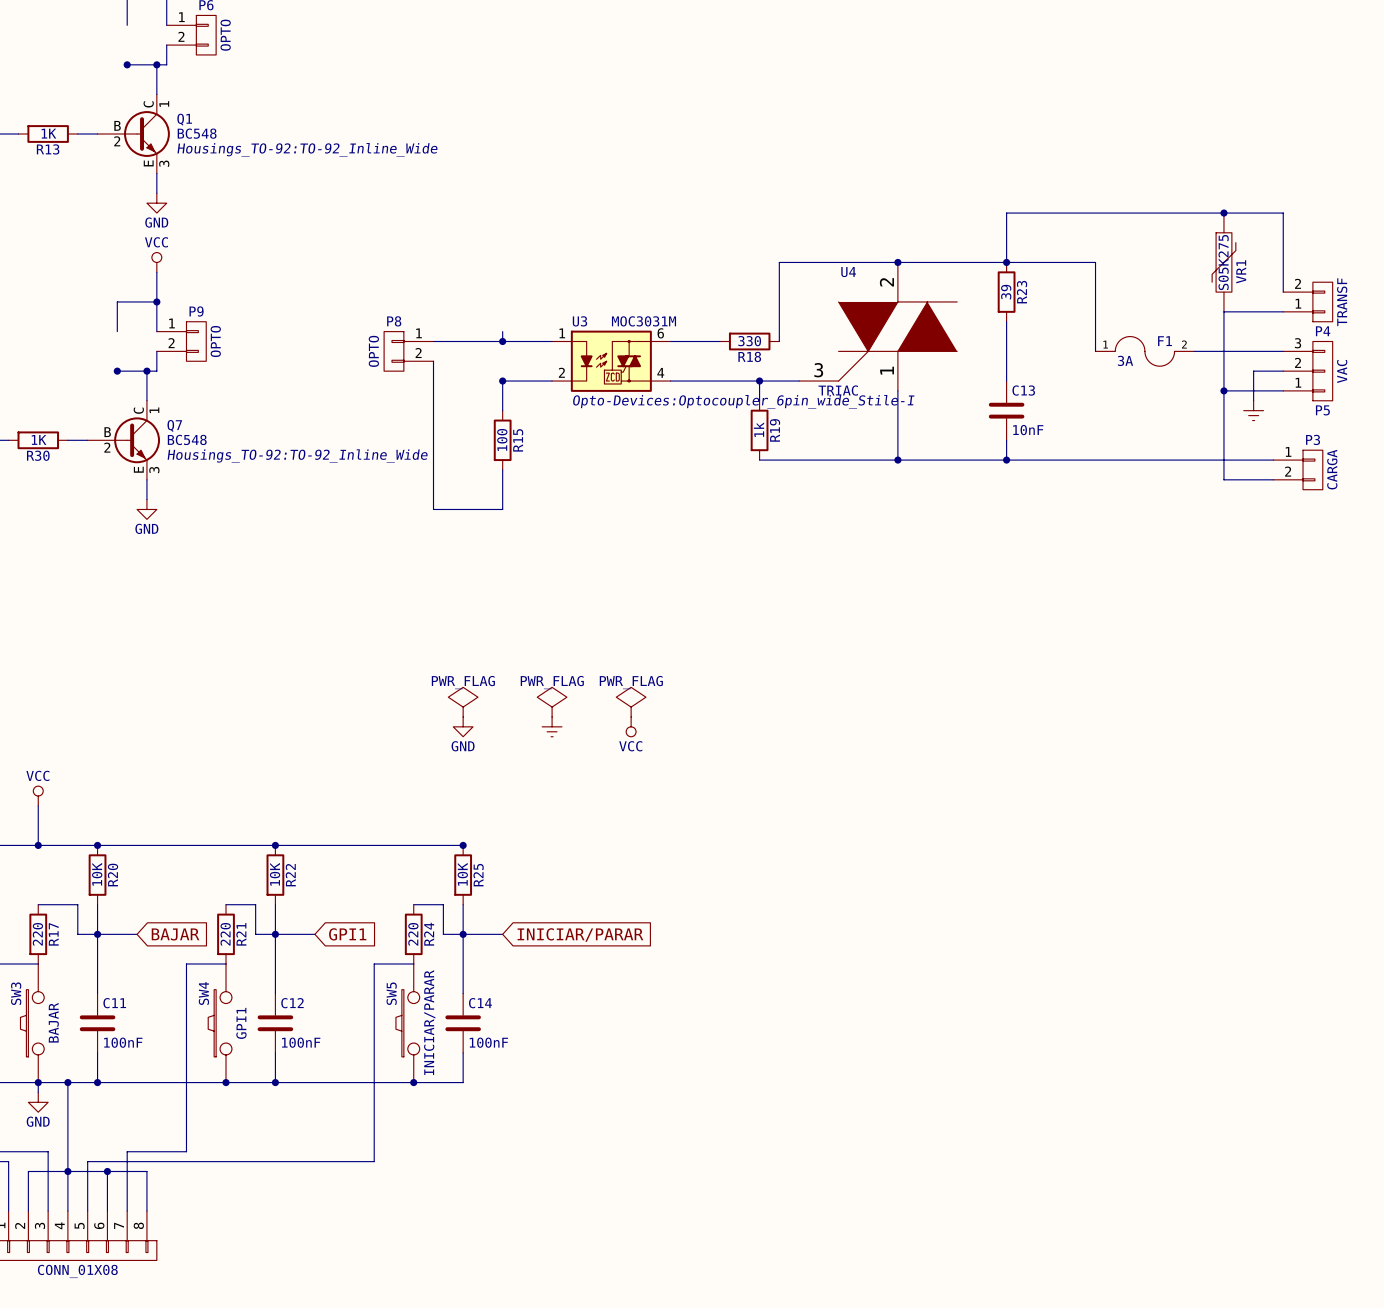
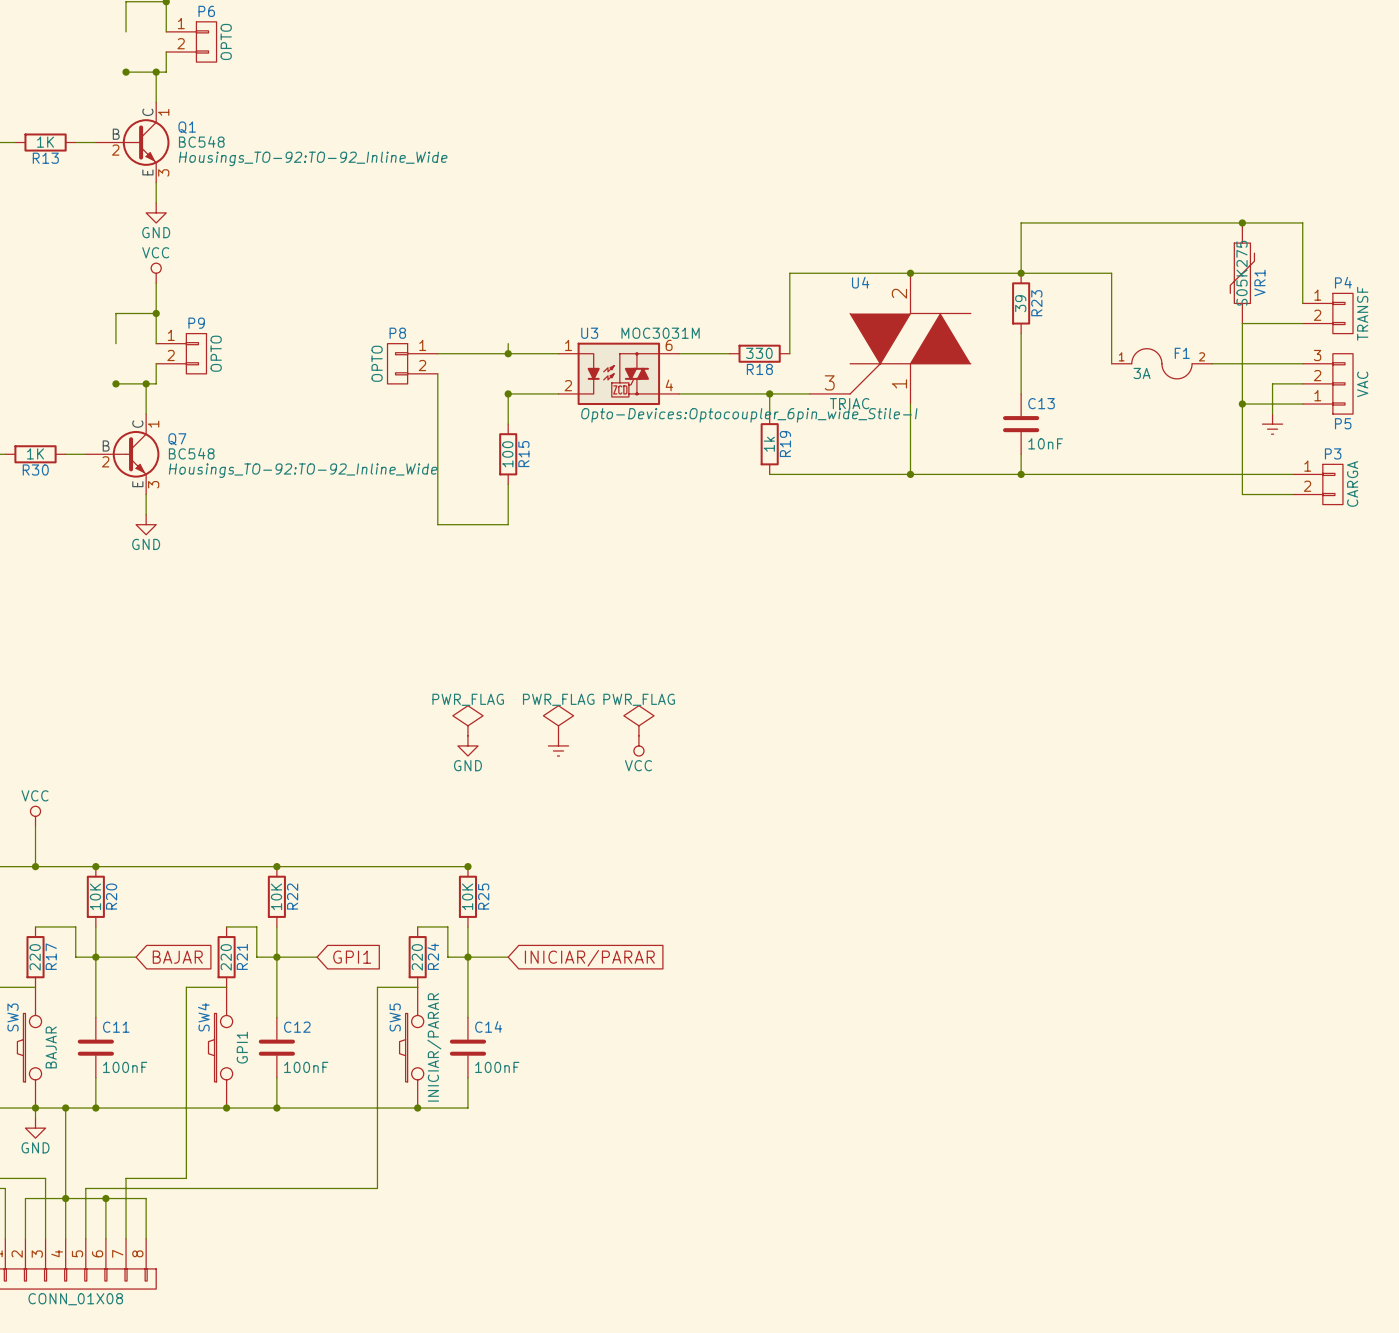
P4 flip: as is (1322, 301) -> up-down (1342, 313)

